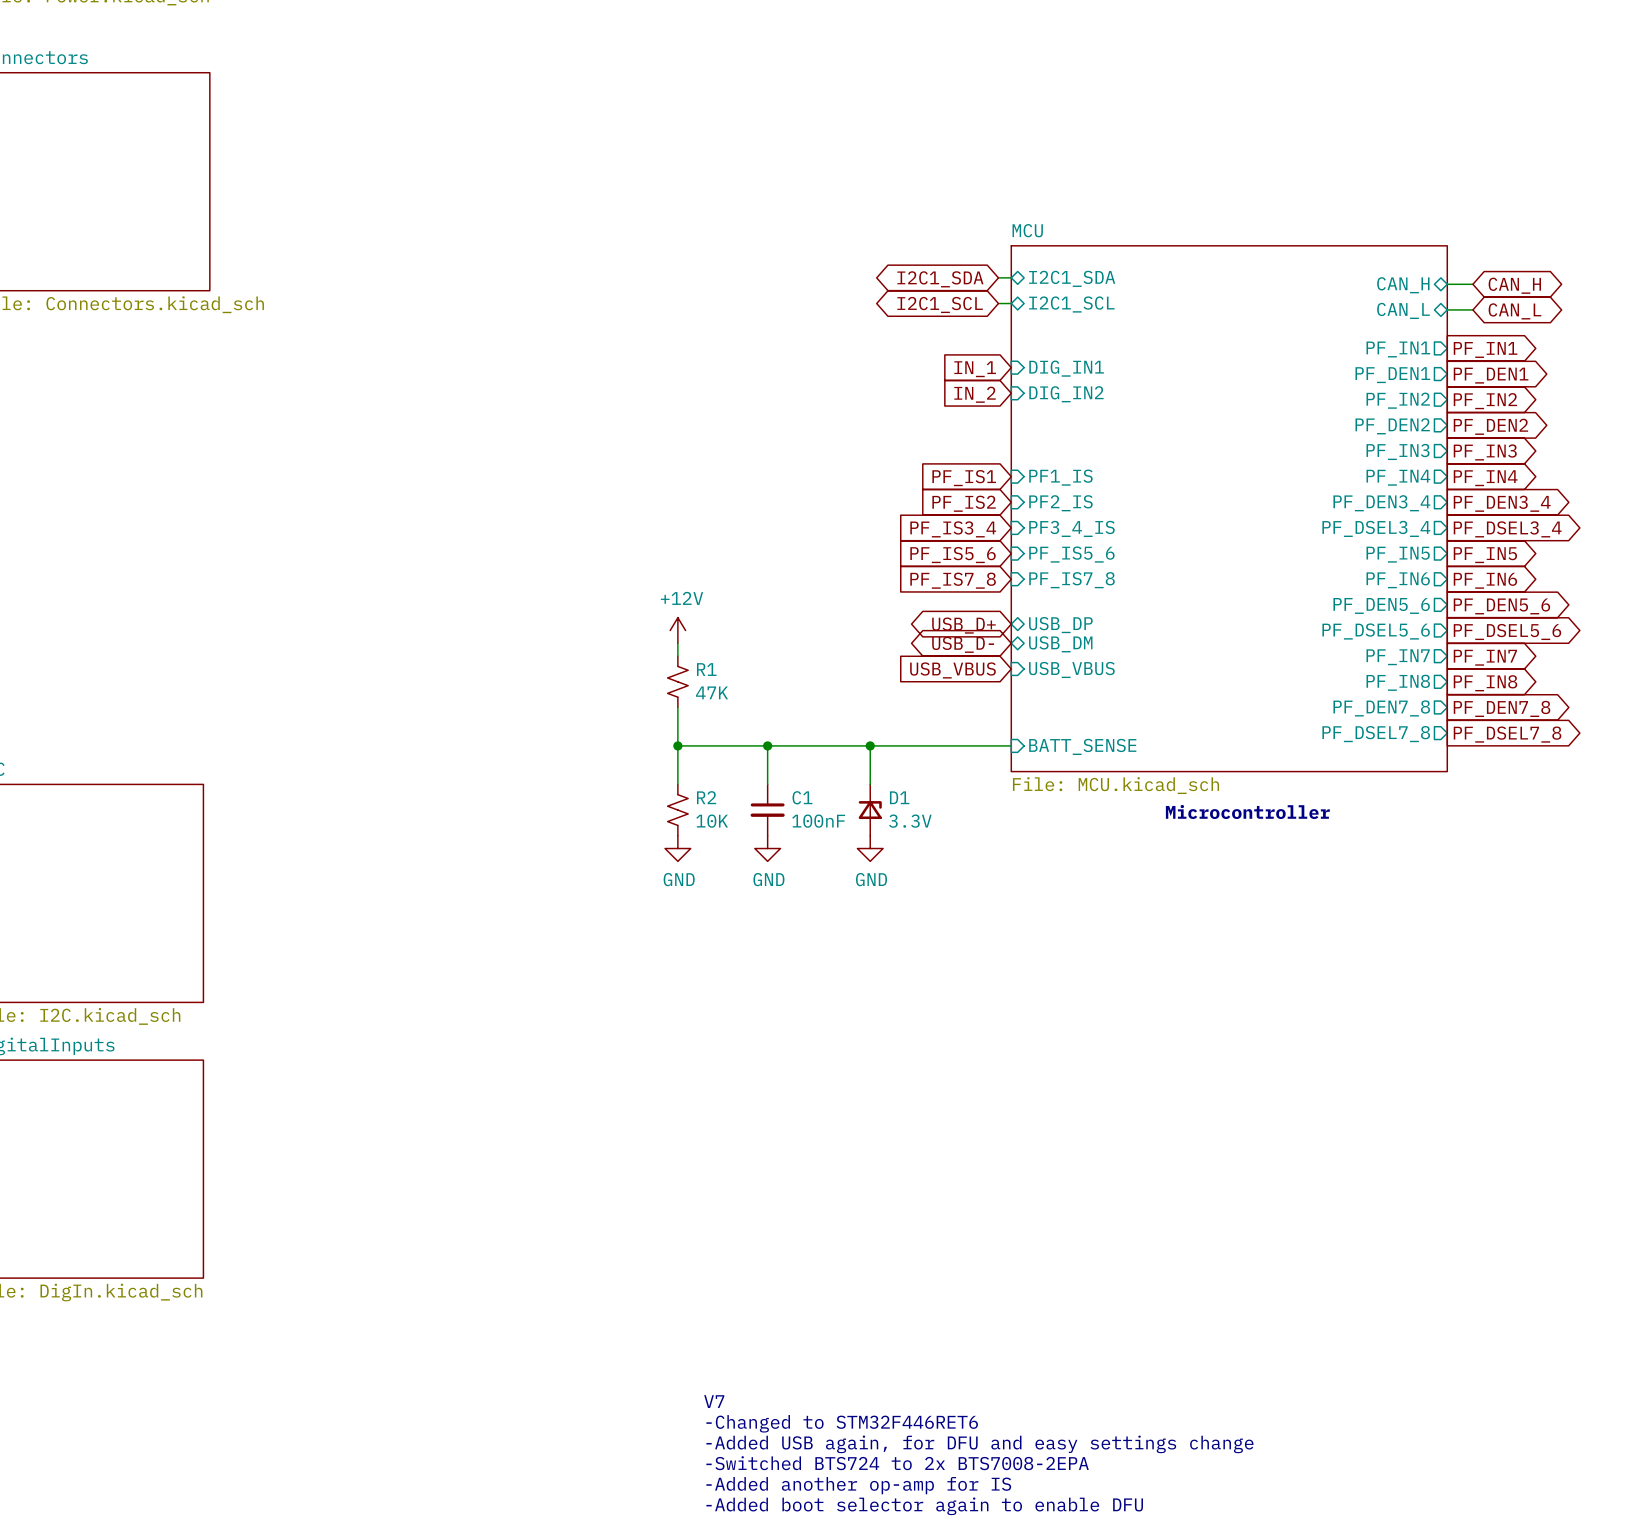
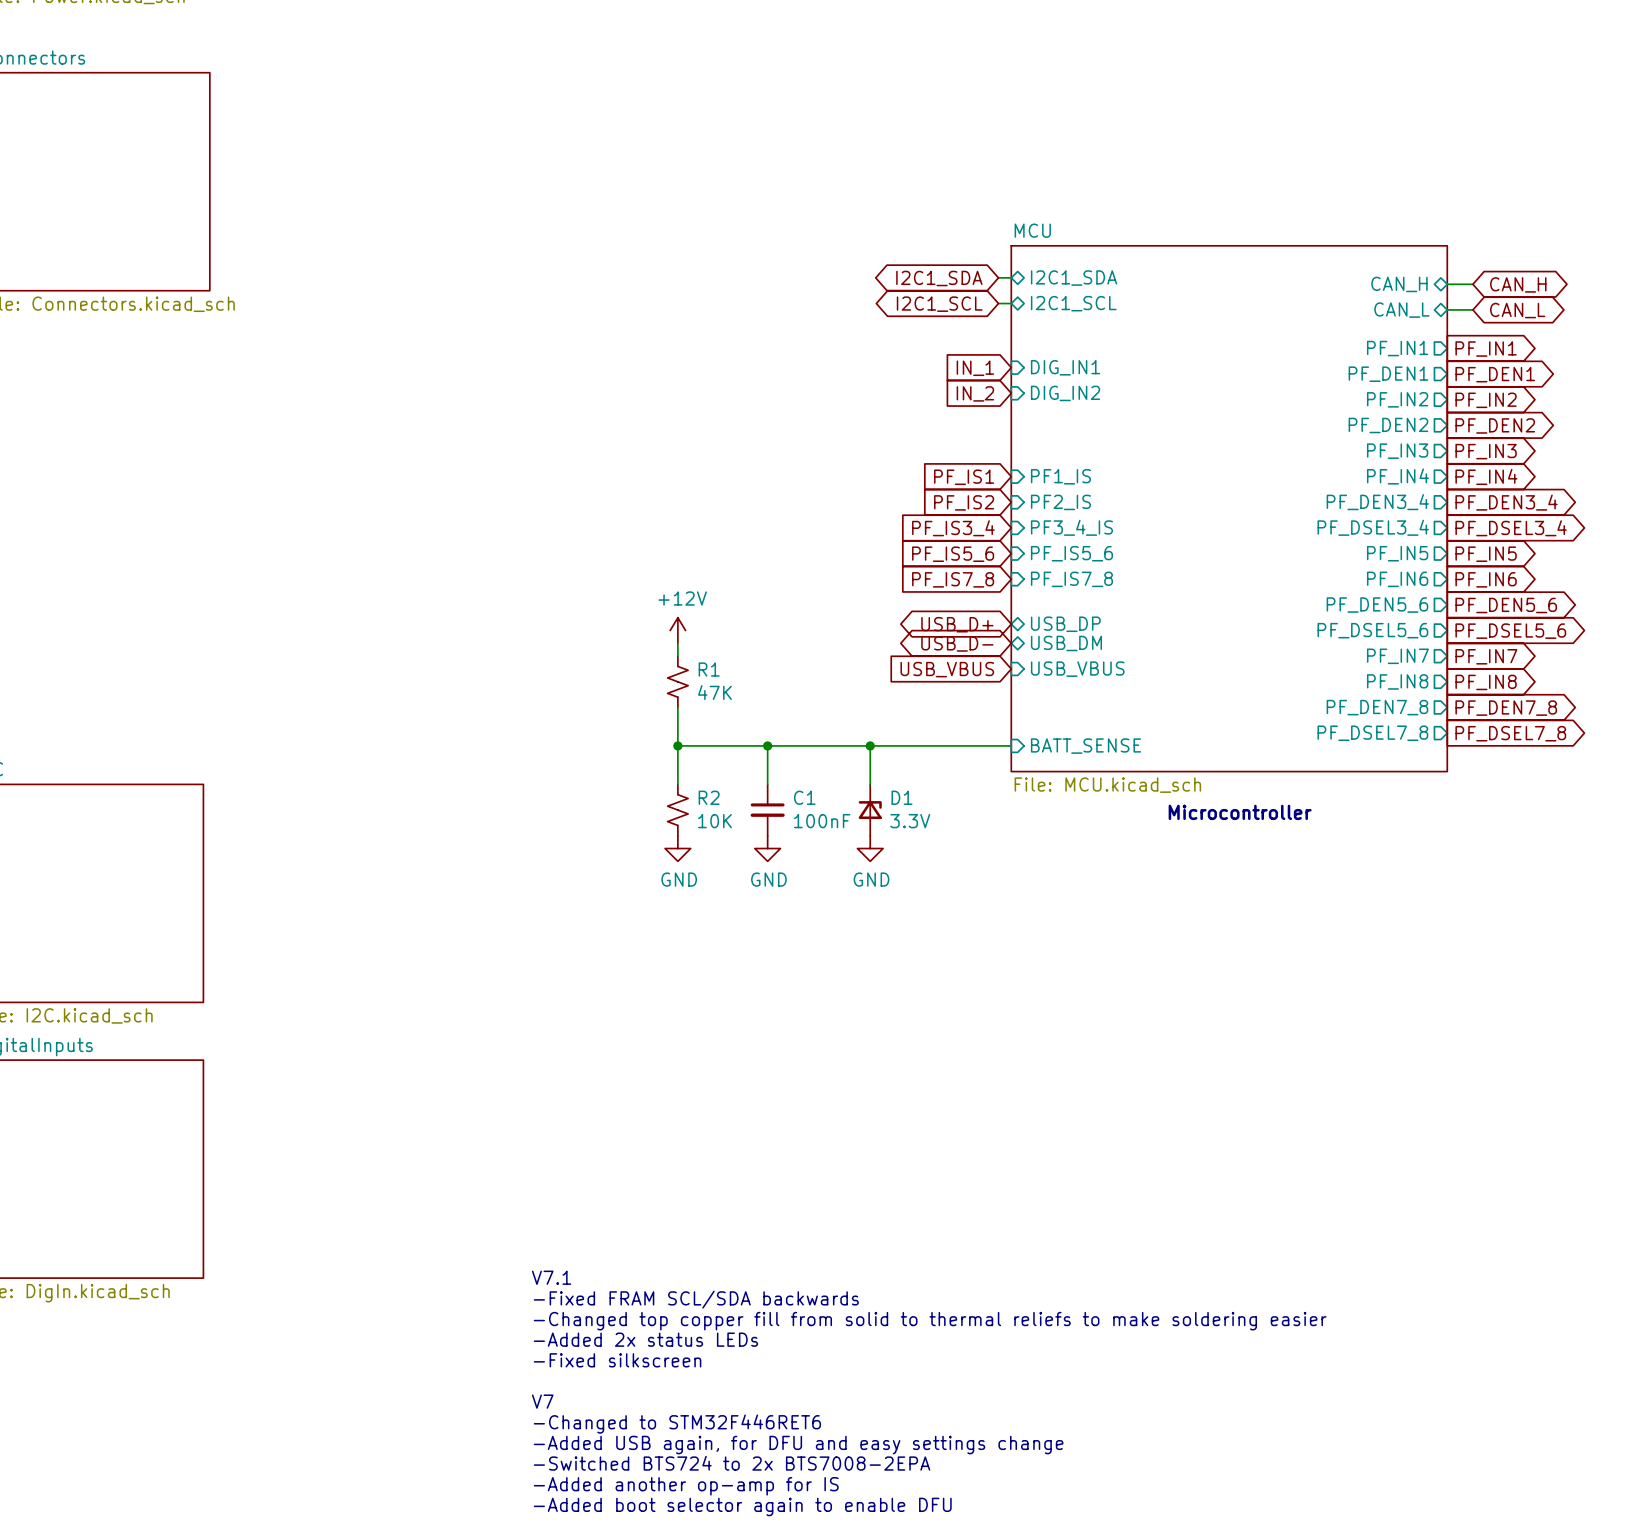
text: none -> V7.1 (551, 1277)
text: none -> -Fixed FRAM SCL/SDA backwards (696, 1299)
text: none -> -Changed top copper fill from solid to thermal reliefs to make soldering easier (930, 1321)
text: none -> -Added 2x status LEDs (645, 1339)
text: none -> -Fixed silkscreen (617, 1360)
text position: V7 (714, 1401) -> V7 (542, 1401)
text position: -Changed to STM32F446RET6 (842, 1423) -> -Changed to STM32F446RET6 (677, 1424)
text position: -Added USB again, for DFU and easy settings change (979, 1444) -> -Added USB again, for DFU and easy settings change (798, 1445)
text position: -Switched BTS724 to 2x BTS7008-2EPA (897, 1463) -> -Switched BTS724 to 2x BTS7008-2EPA (732, 1463)
text position: -Added another op-amp for IS (858, 1485) -> -Added another op-amp for IS (686, 1486)
text position: -Added boot selector again to enable DFU (924, 1506) -> -Added boot selector again to enable DFU (742, 1506)

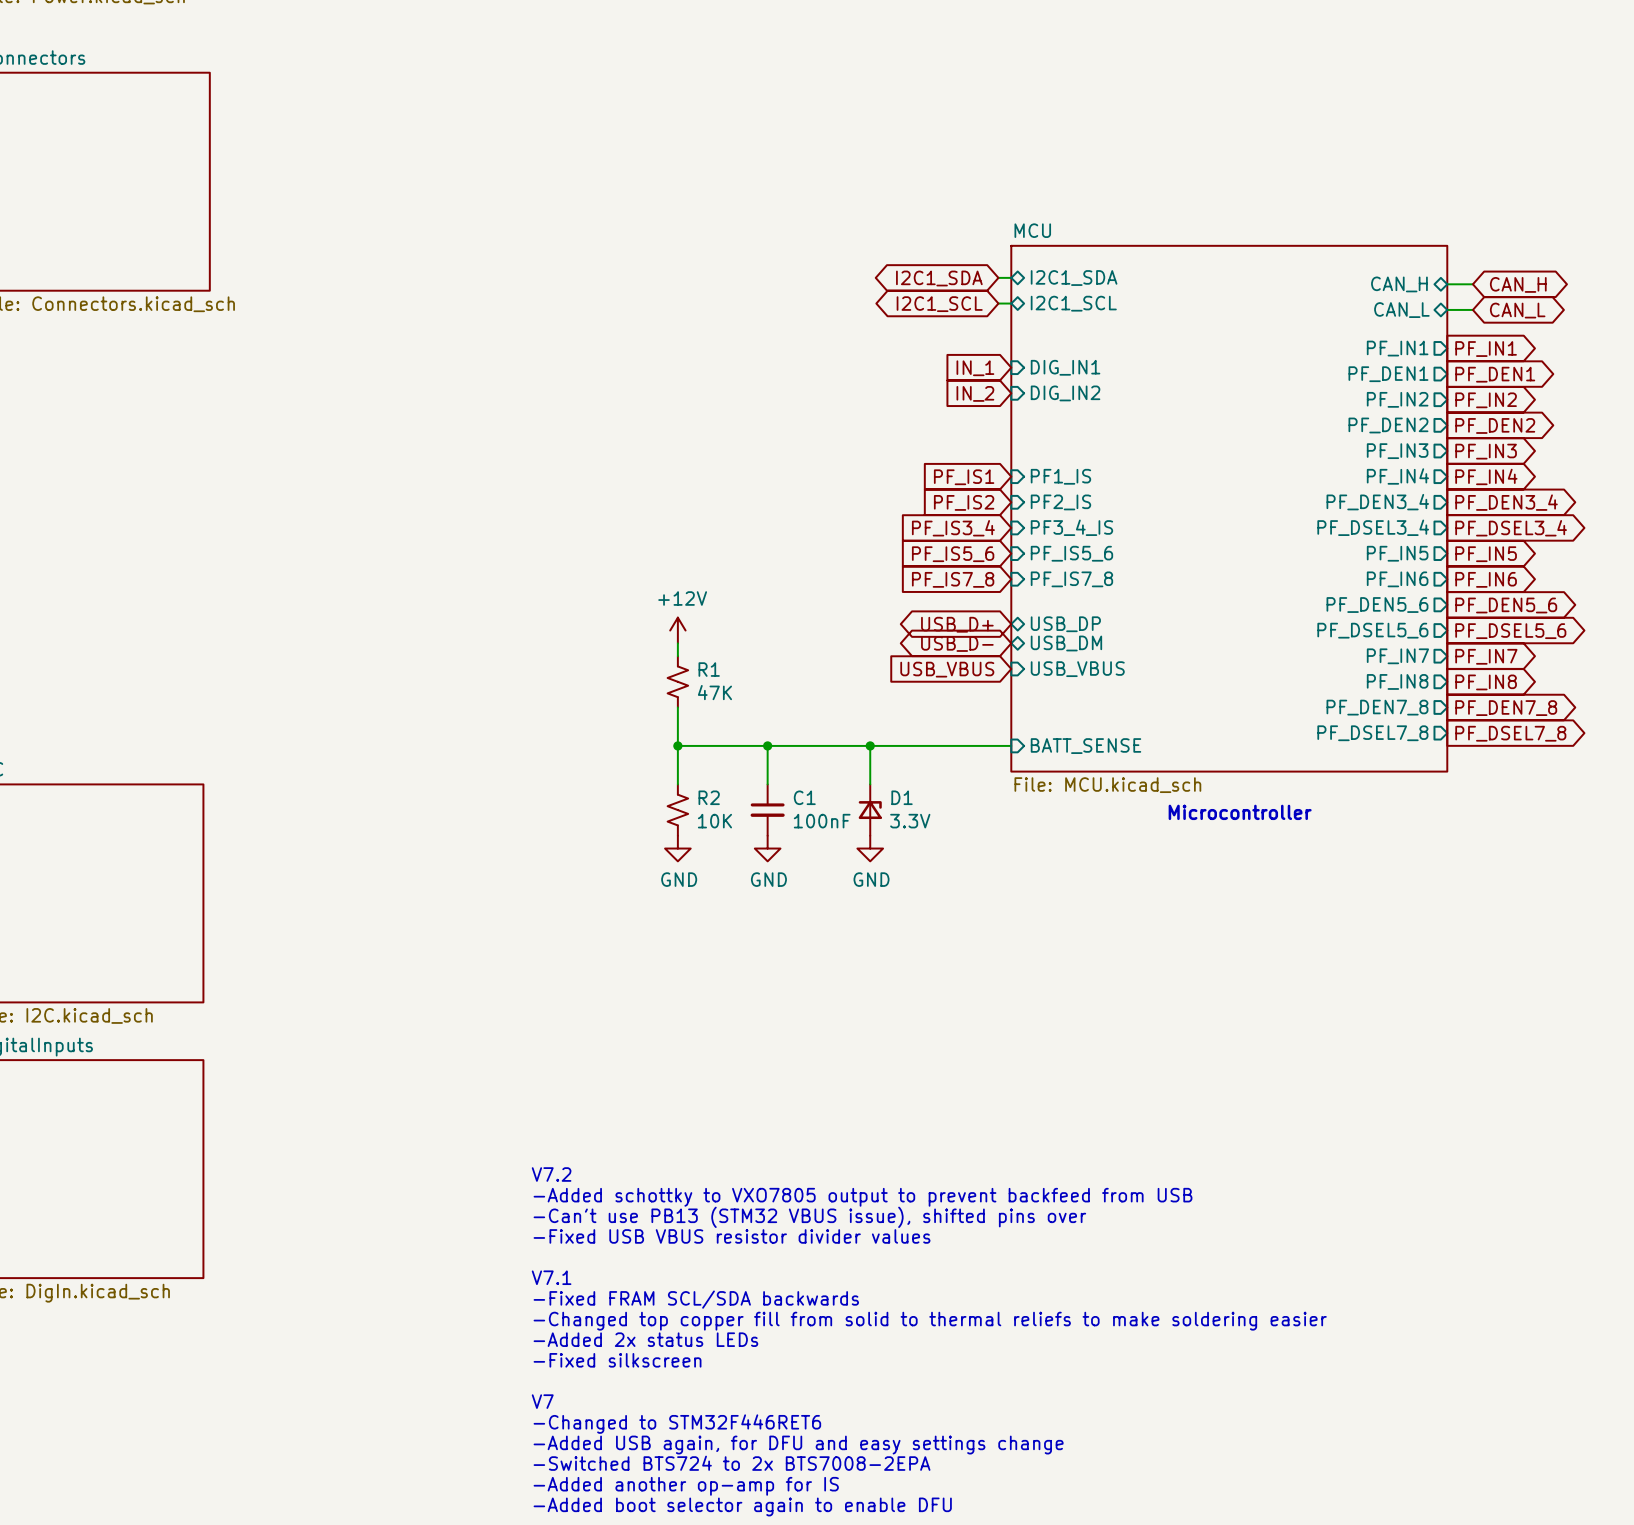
text: none -> V7.2 (551, 1174)
text: none -> -Added schottky to VXO7805 output to prevent backfeed from USB (863, 1197)
text: none -> -Can't use PB13 (STM32 VBUS issue), shifted pins over (809, 1217)
text: none -> -Fixed USB VBUS resistor divider values (732, 1236)

